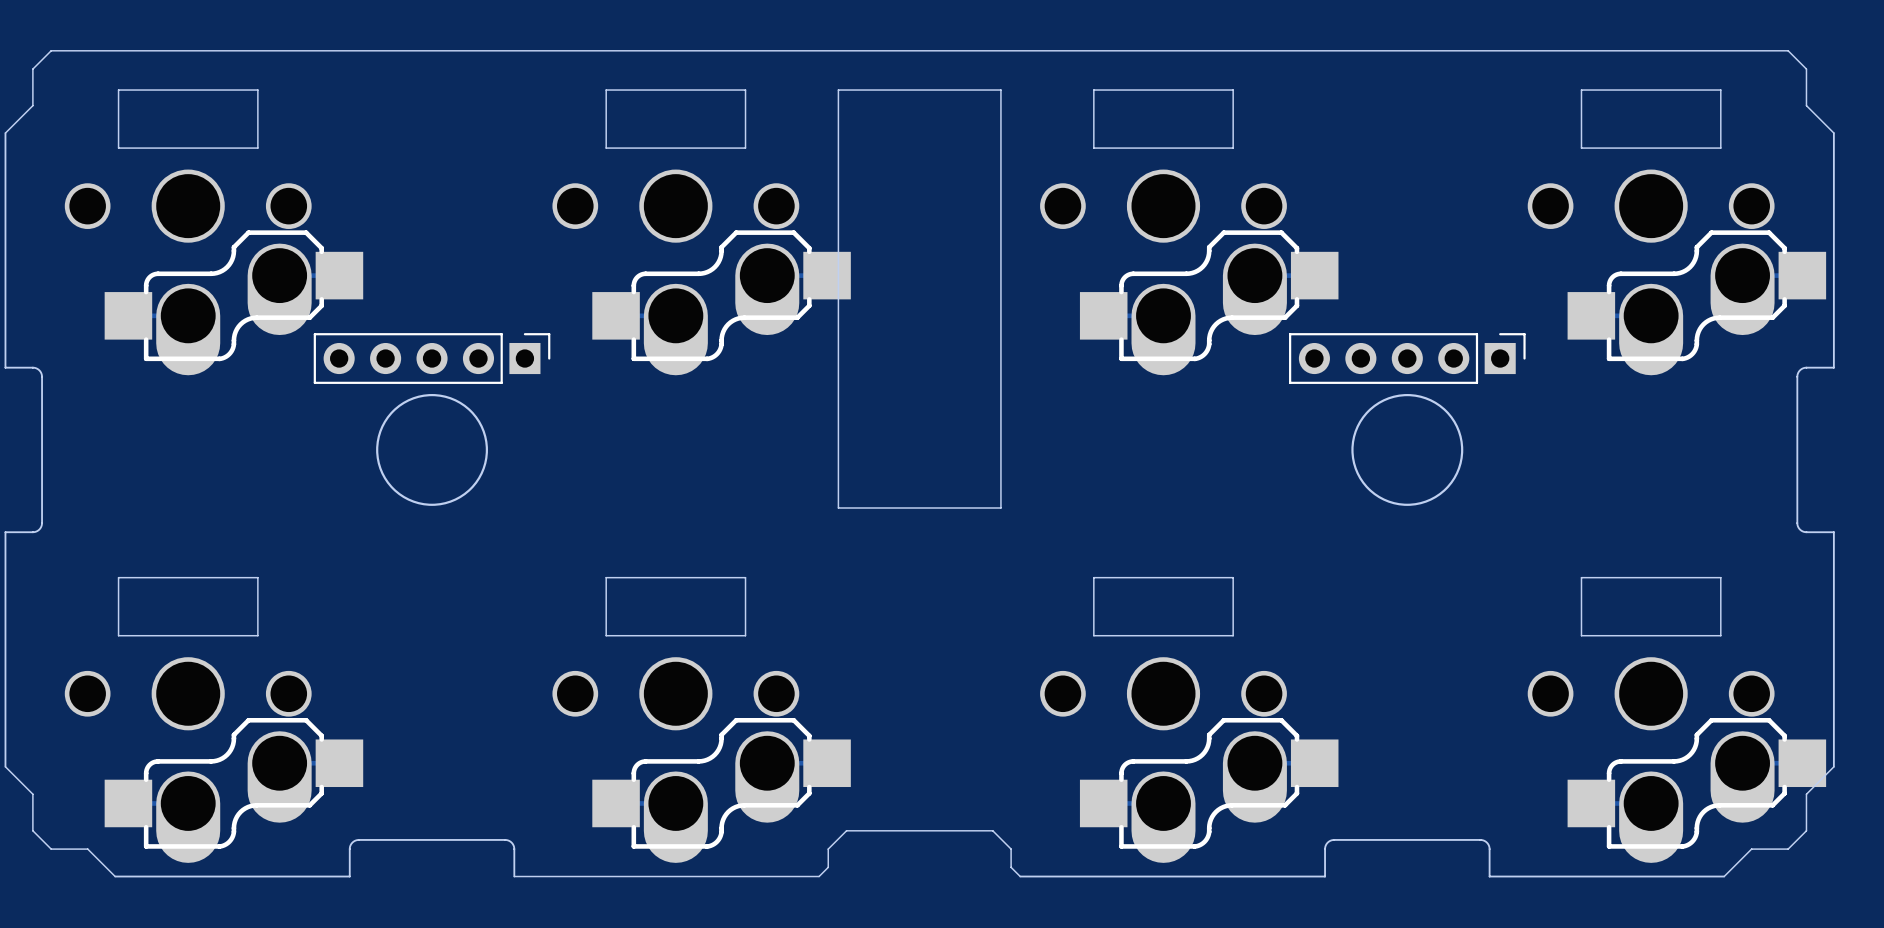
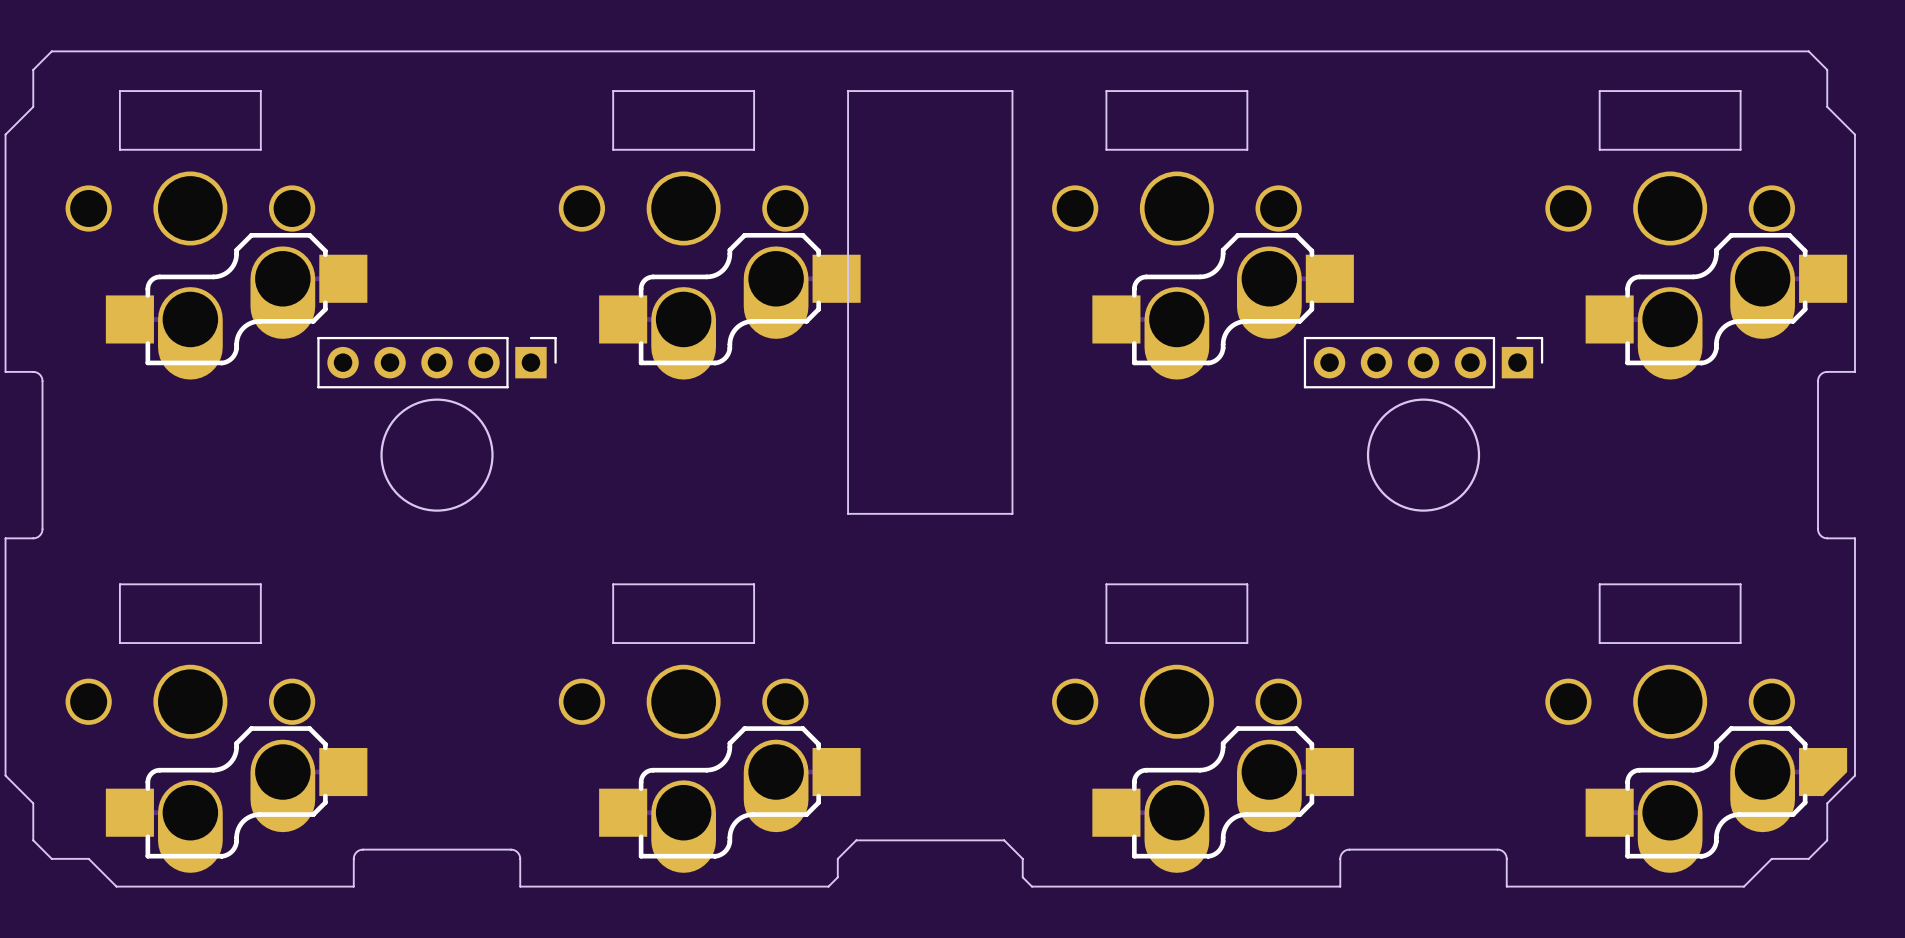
part footprint: [1527, 657, 1827, 863] -> [1545, 664, 1848, 873]

